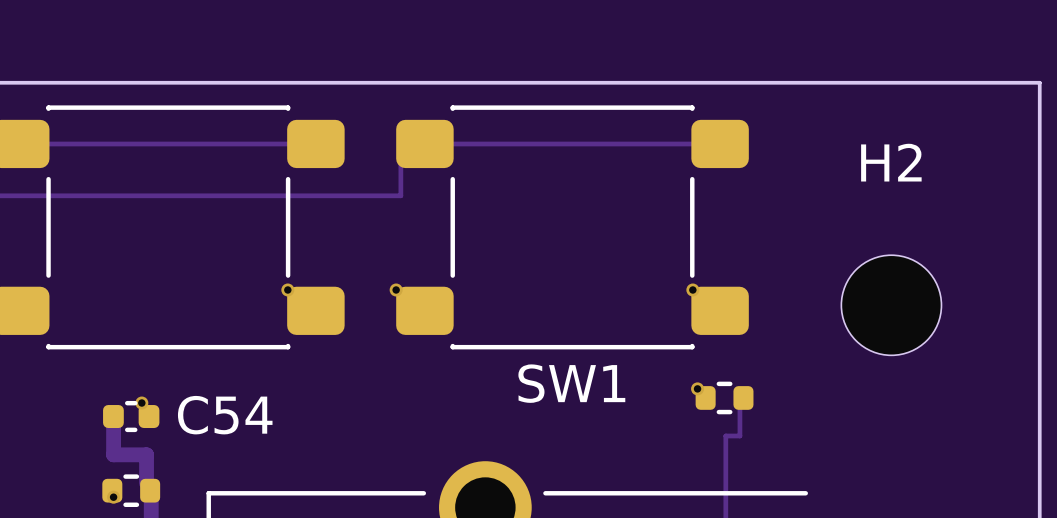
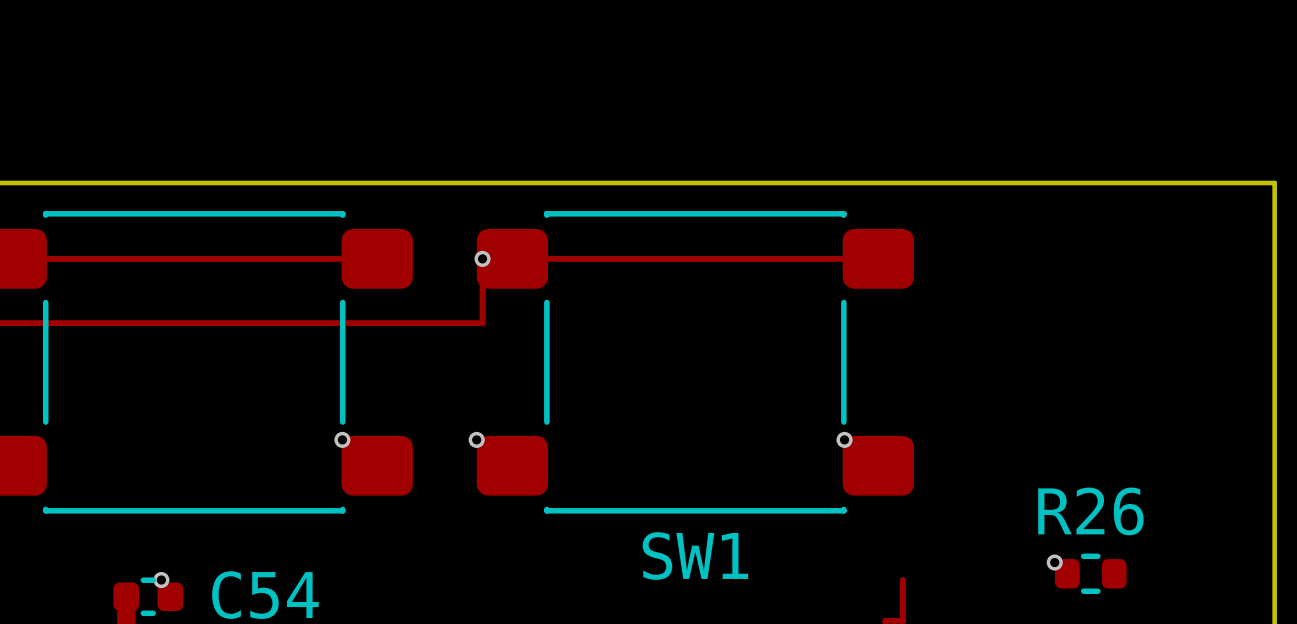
via: none -> (482, 258)
H2: (891, 305) -> none
via position: (697, 388) -> (1054, 562)
part: (724, 397) -> none
R26: none -> (1090, 573)

